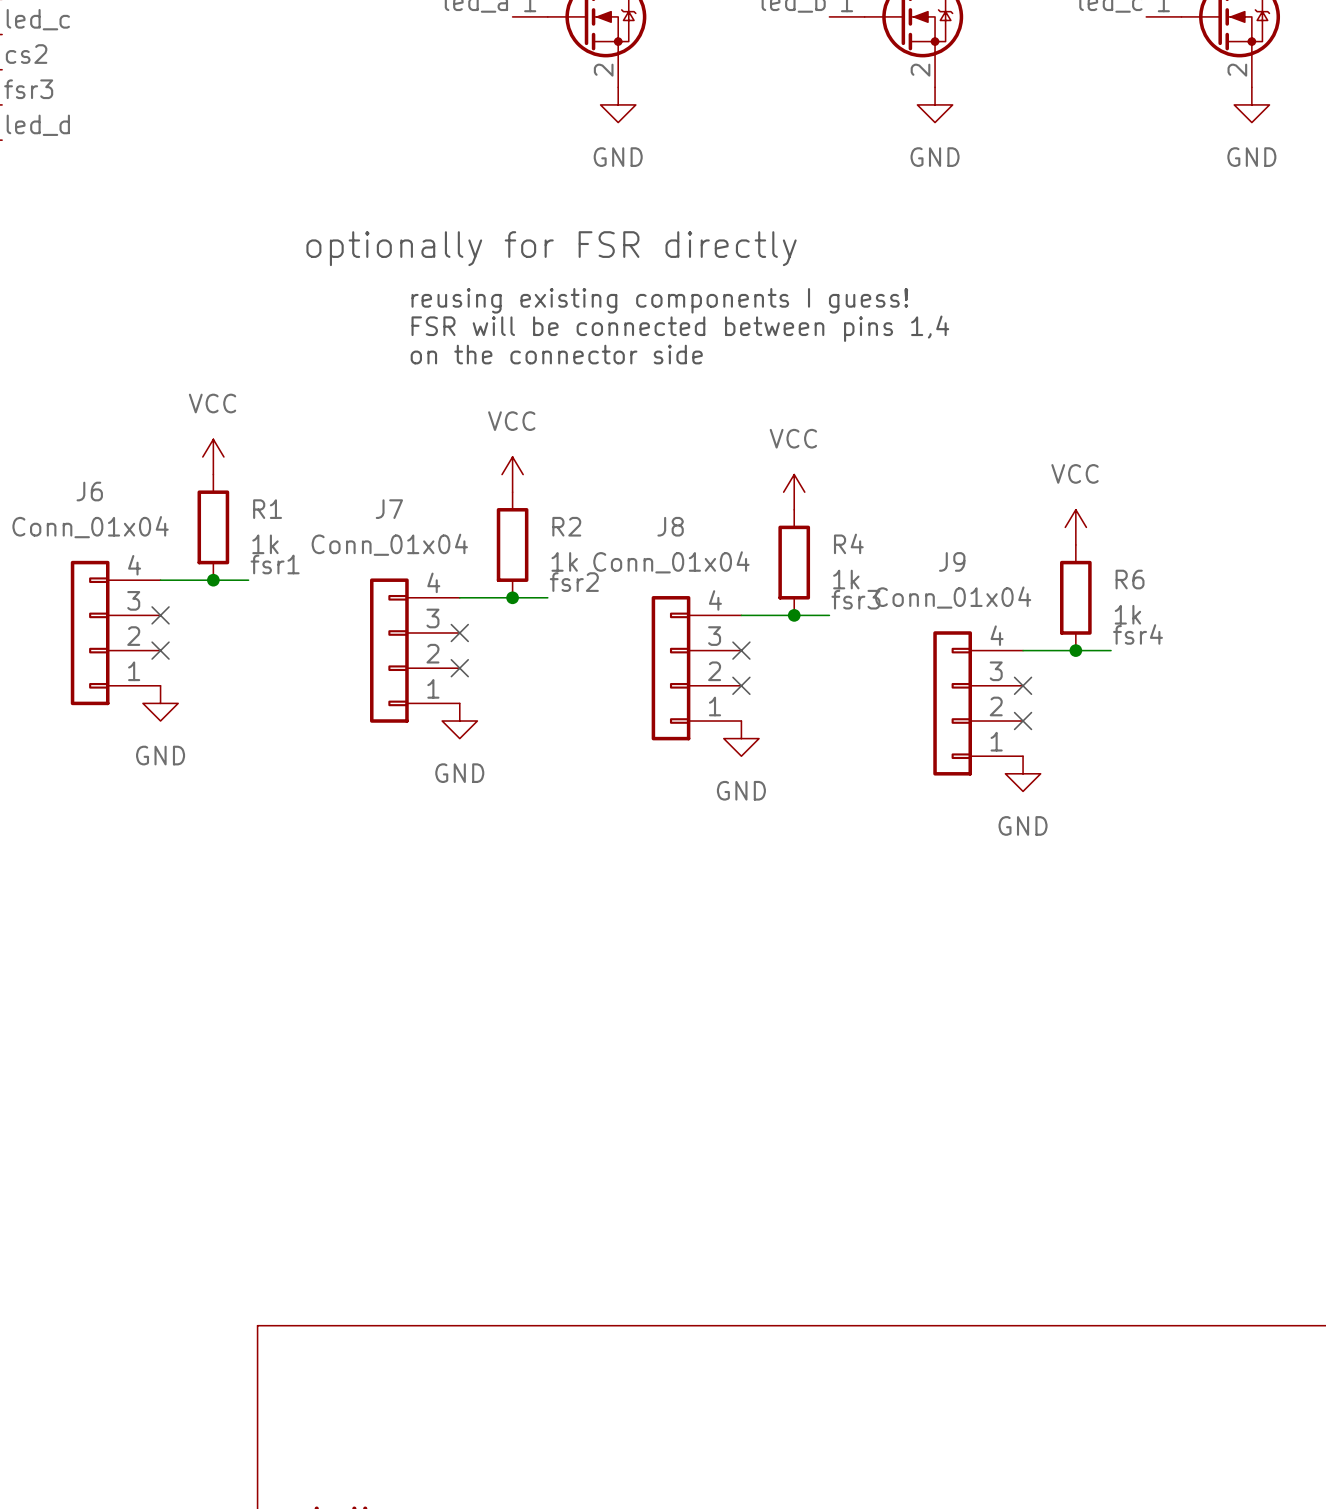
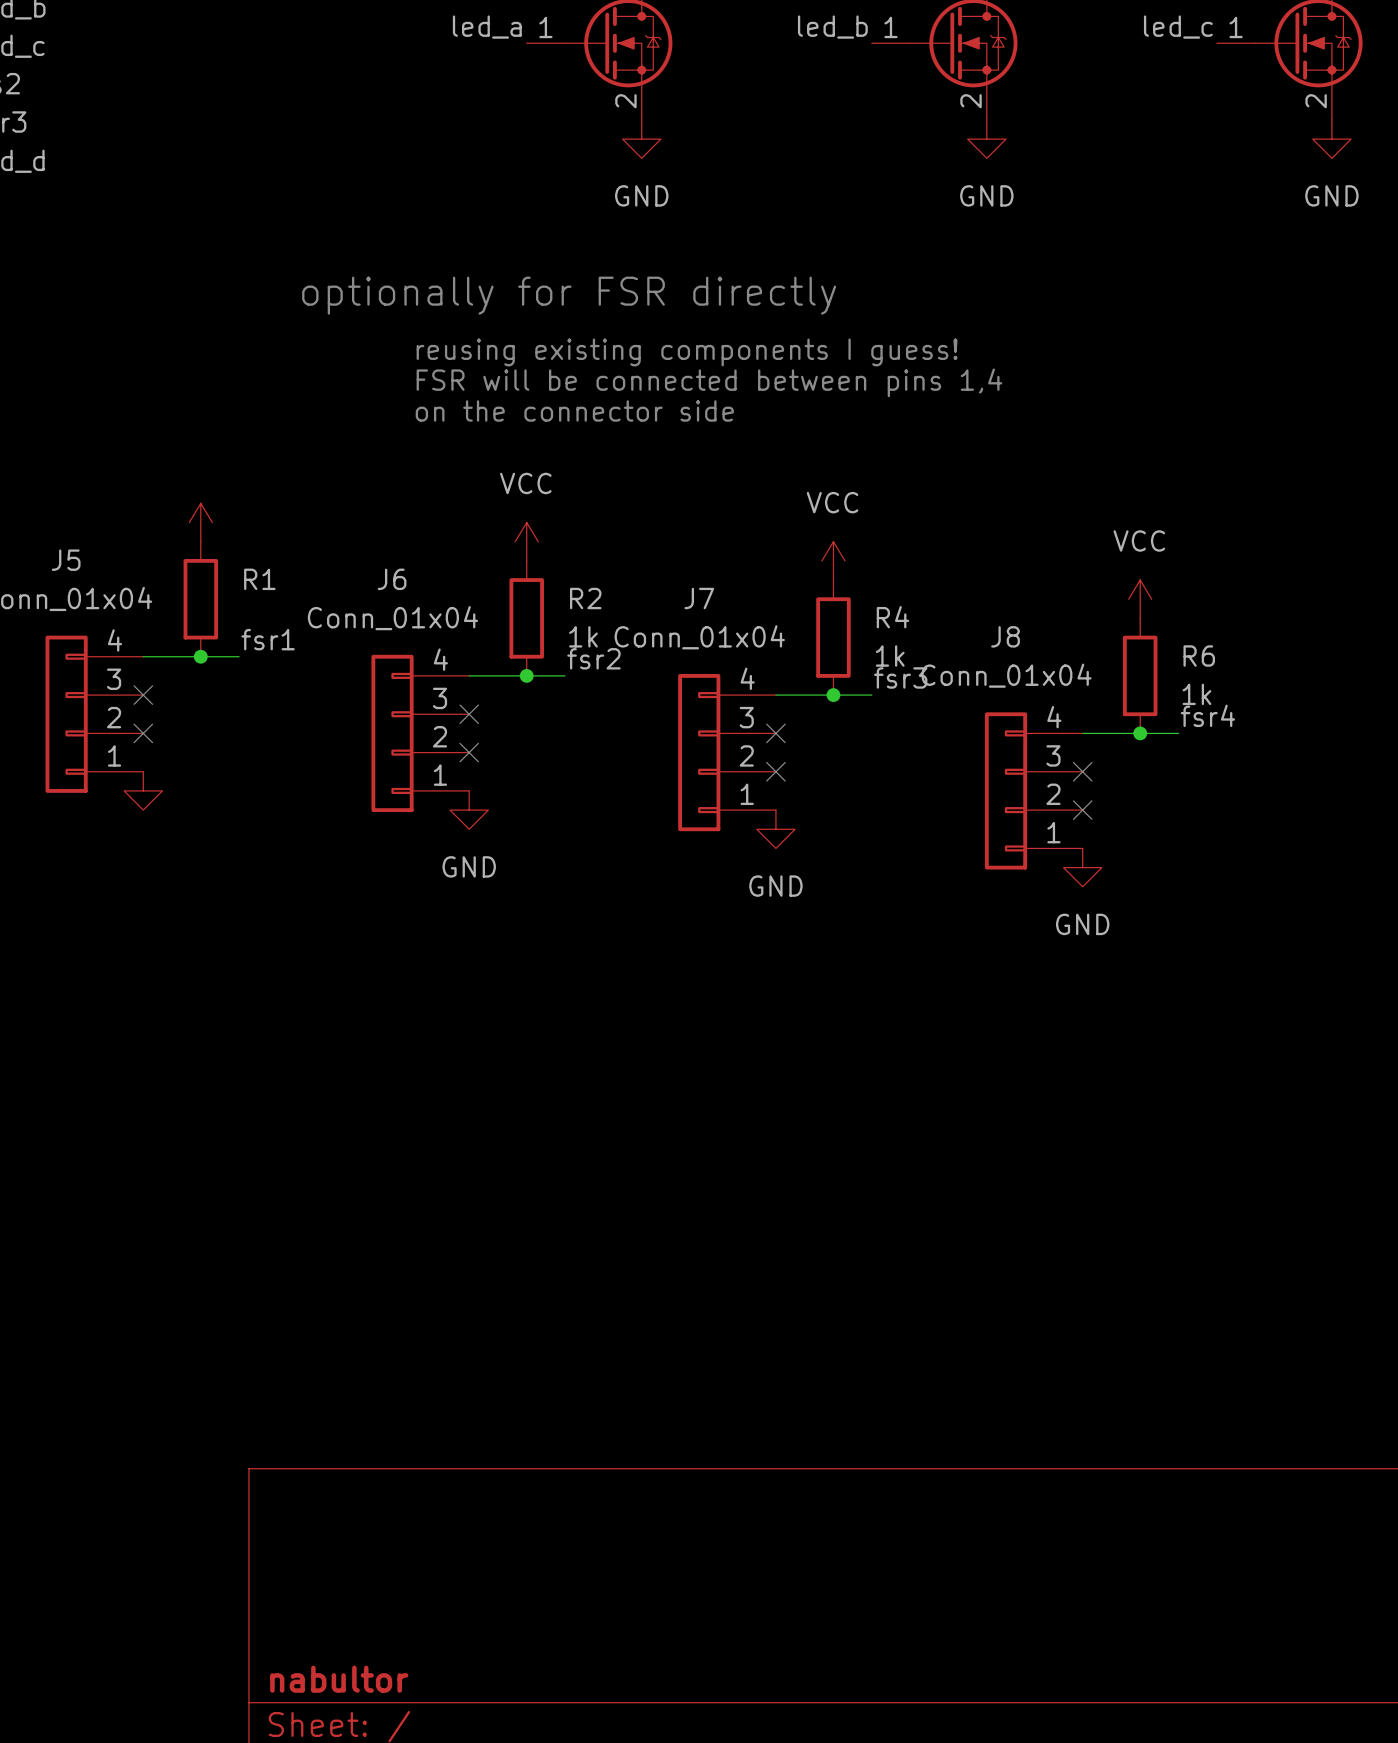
power symbol text: VCC (212, 403) -> none
J6 name: J6 (89, 491) -> J5 (66, 560)
J7 name: J7 (389, 509) -> J6 (392, 579)
J8 name: J8 (670, 526) -> J7 (699, 598)
R1 value: 1k (265, 544) -> none
J9 name: J9 (952, 561) -> J8 (1005, 636)
power symbol text: GND (160, 755) -> none

